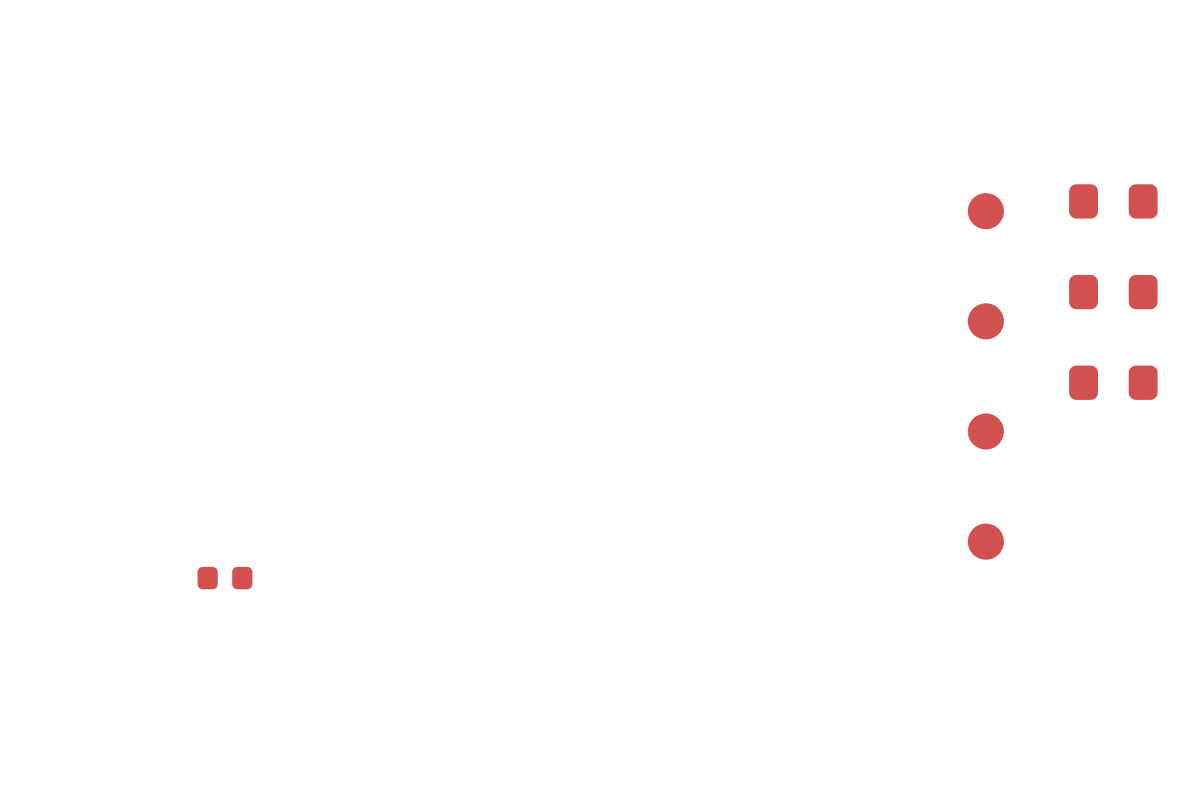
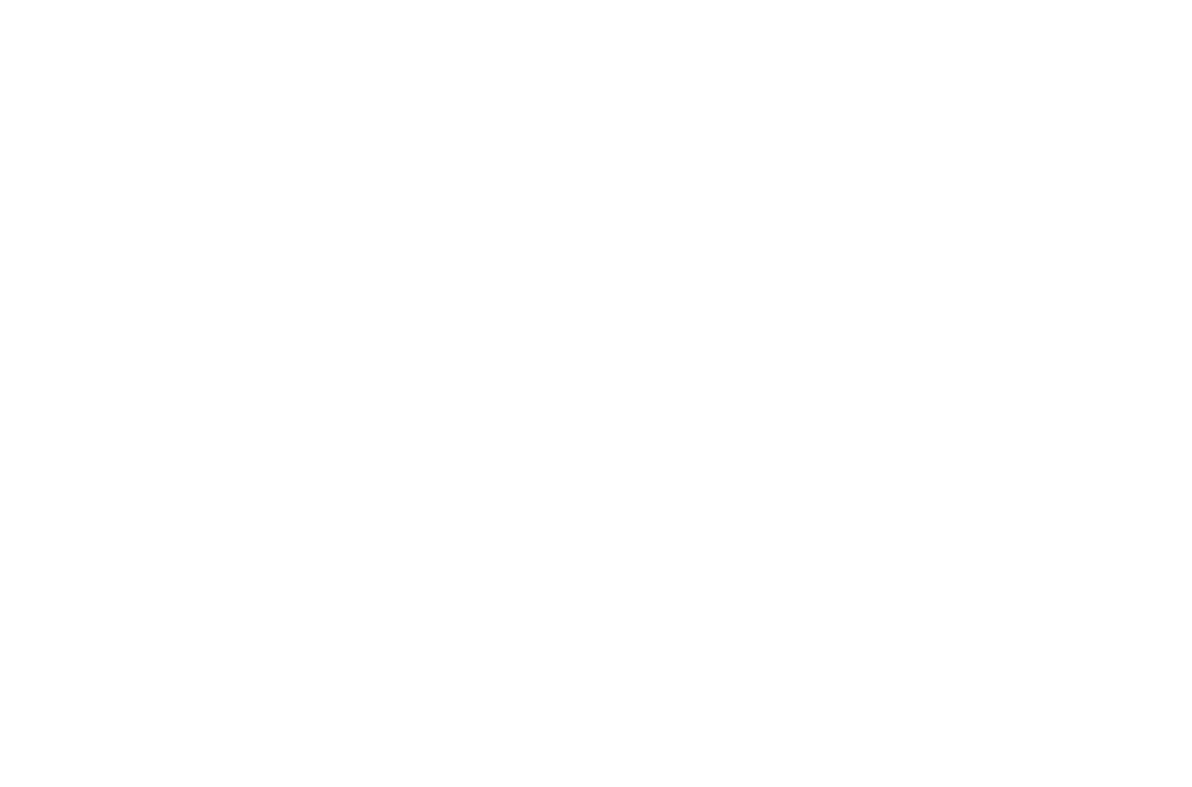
part: (1113, 201) -> none
part: (985, 211) -> none
part: (1113, 292) -> none
part: (985, 321) -> none
part: (1113, 382) -> none
part: (985, 431) -> none
part: (985, 541) -> none
part: (224, 578) -> none

